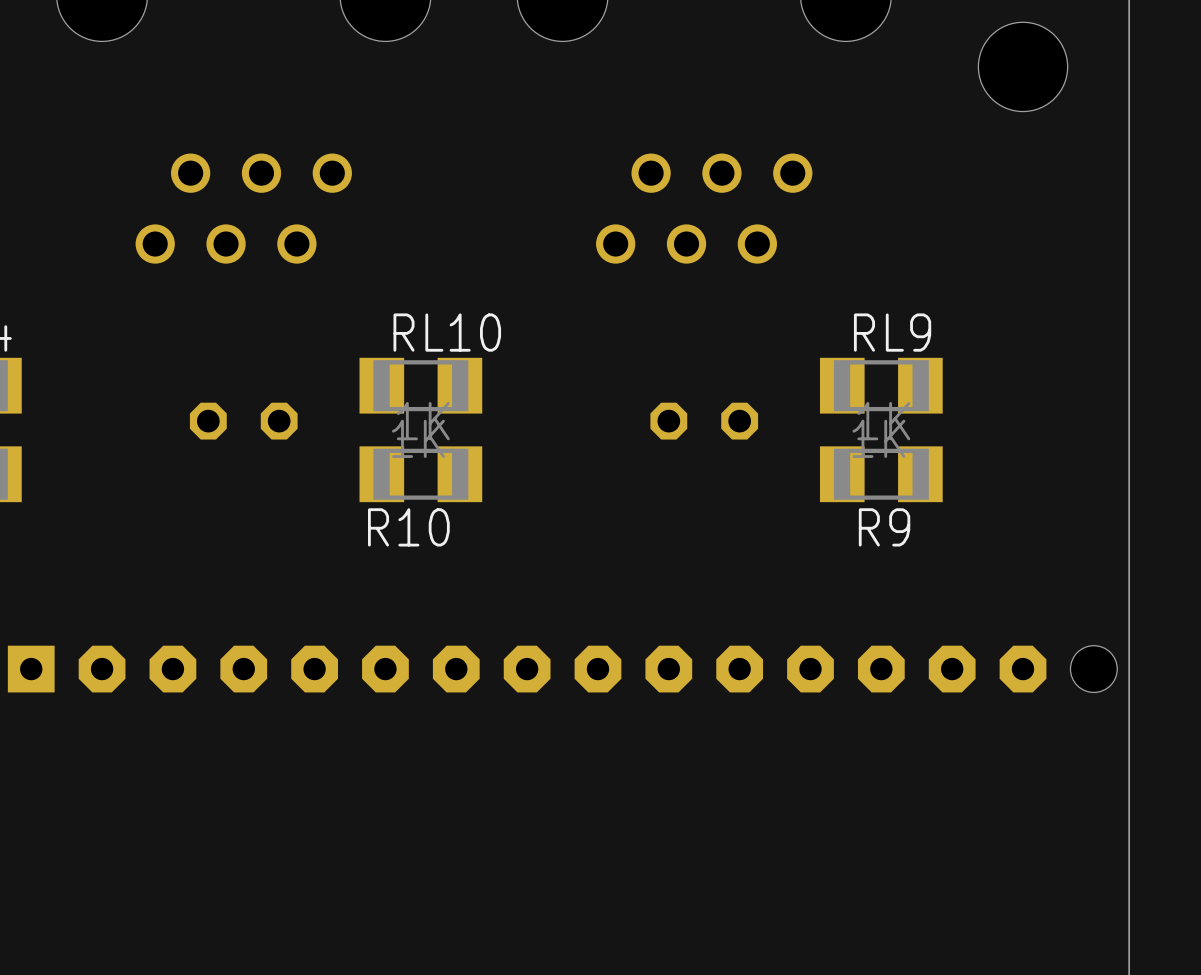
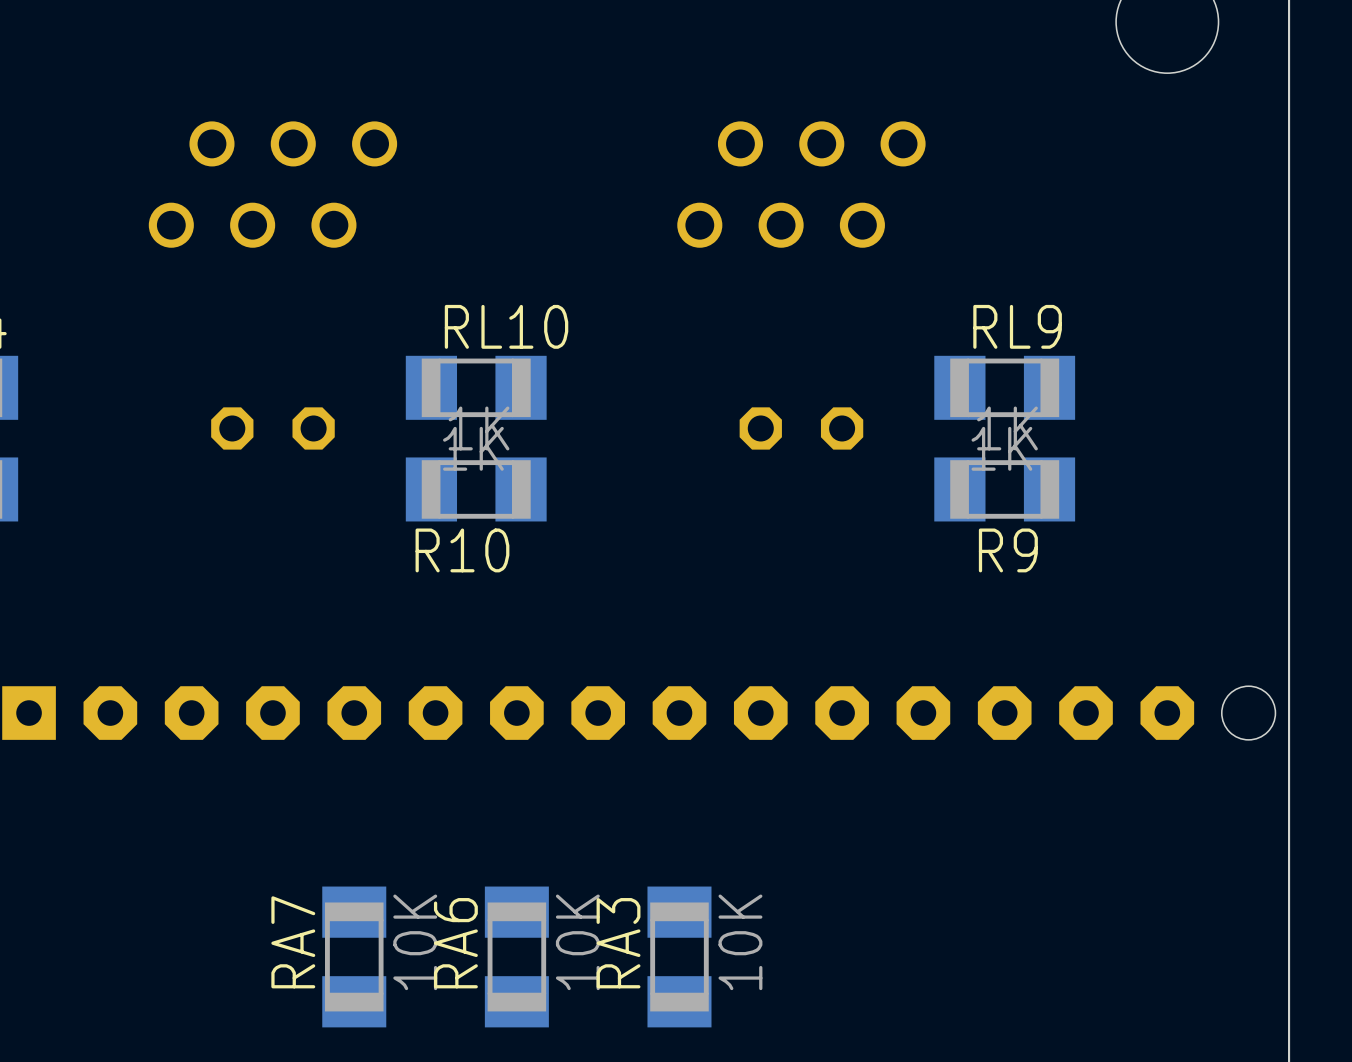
RA7: none -> 10K (354, 956)
RA6: none -> 10K (516, 956)
RA3: none -> 10K (679, 956)

